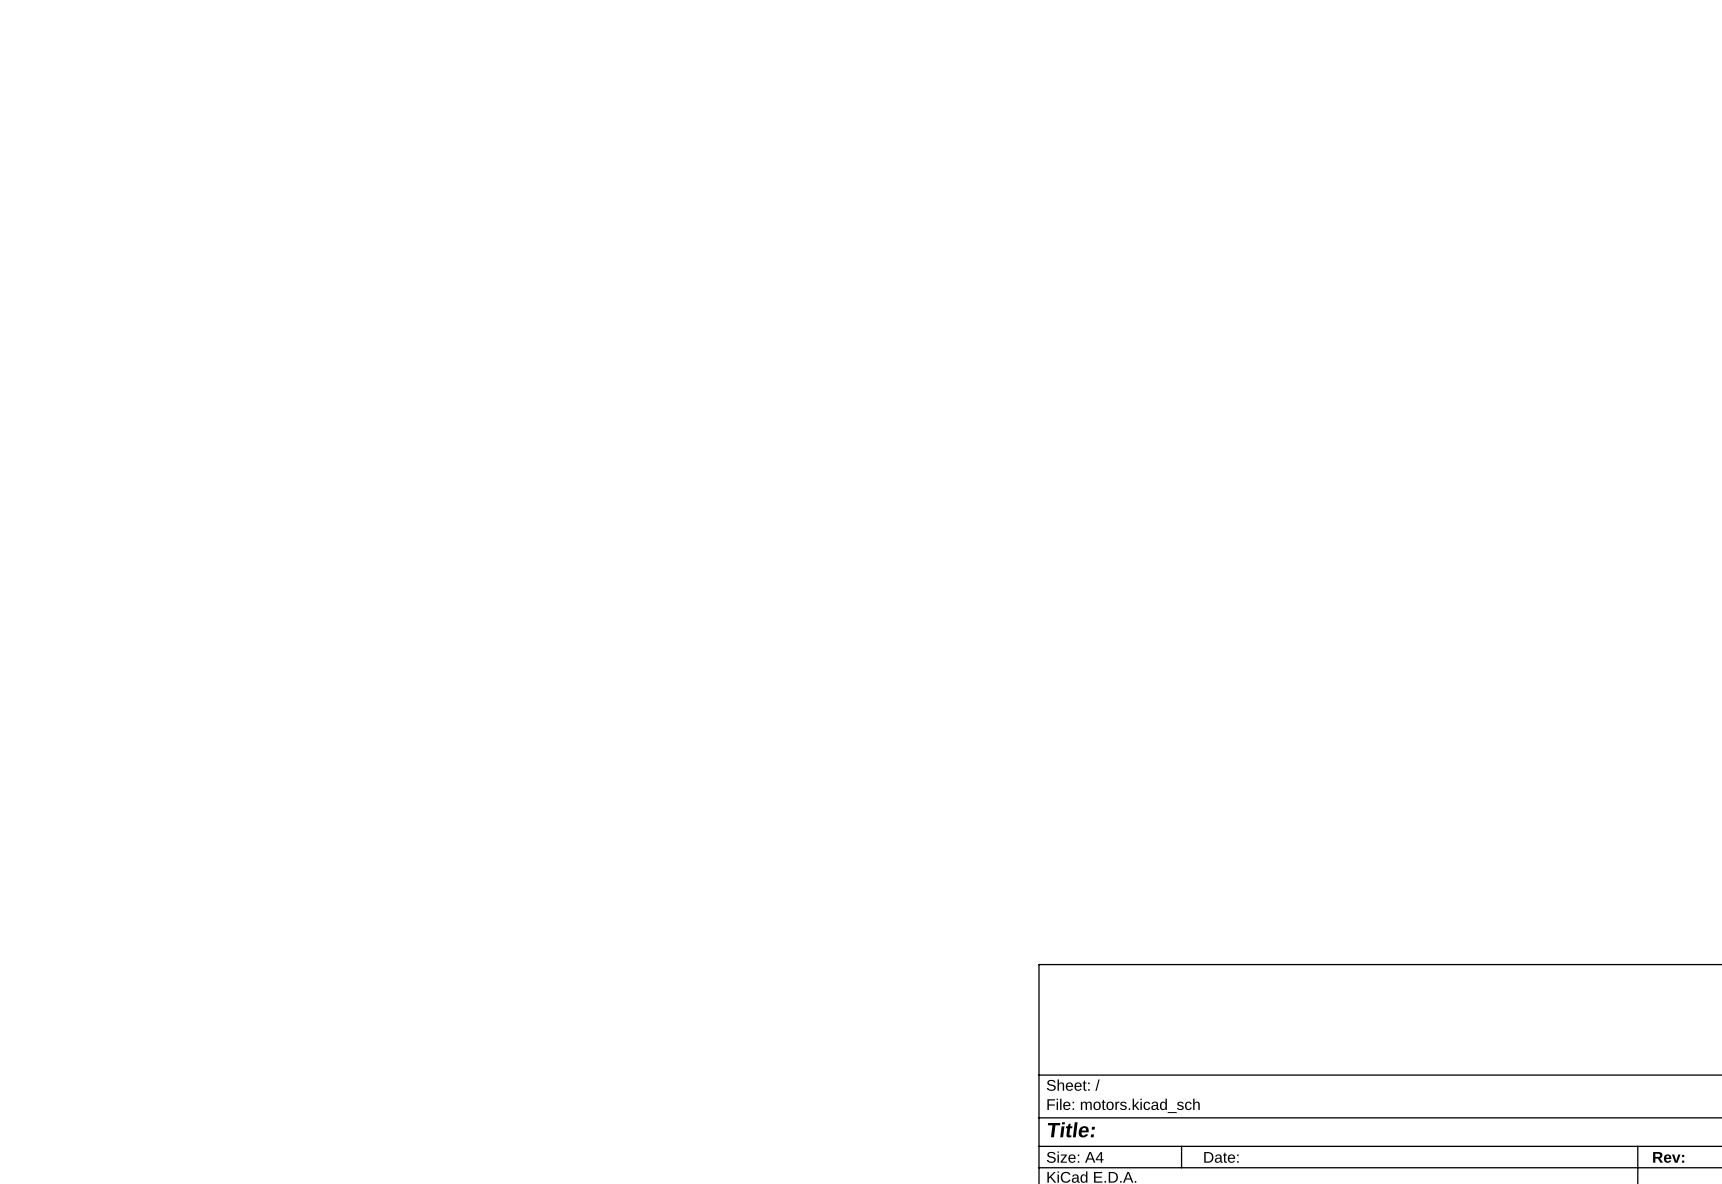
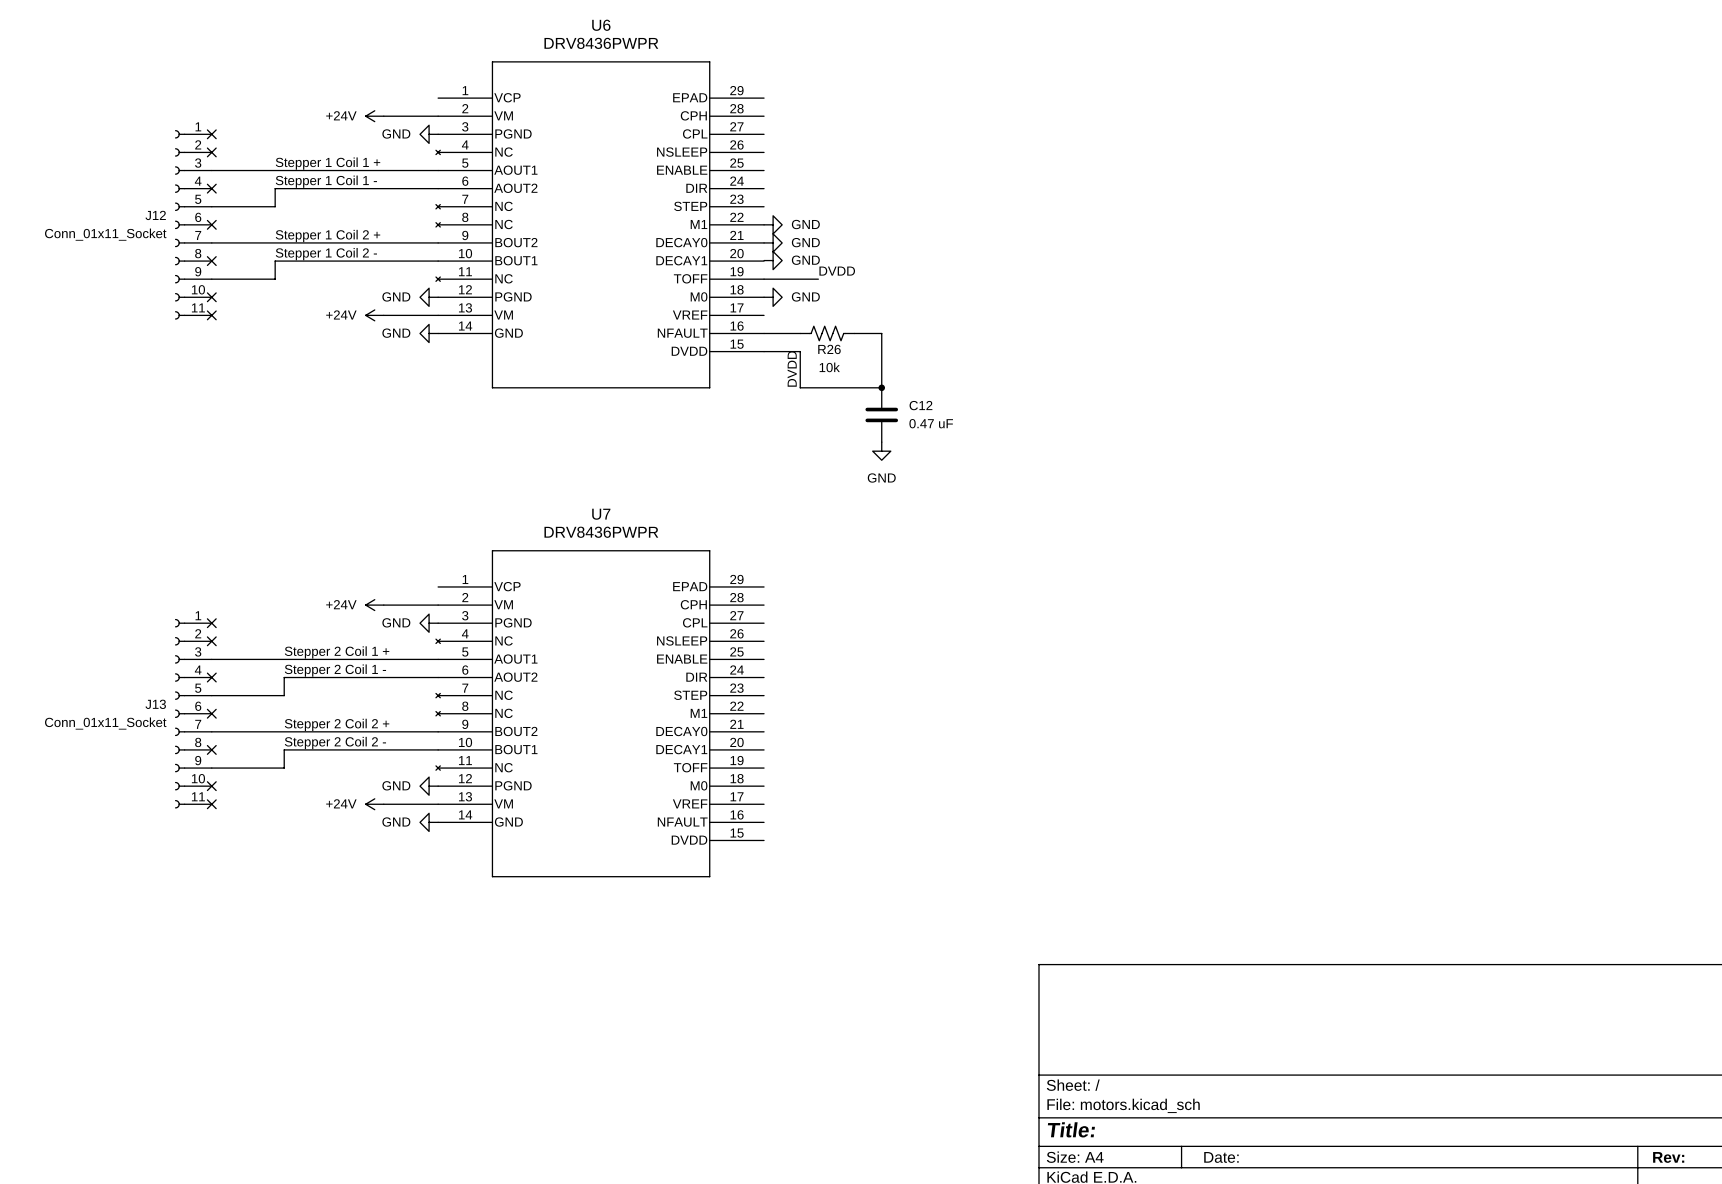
power symbol: none -> +24V (374, 116)
wire: none -> (383, 116) (438, 116)
no-connect mark: none -> (211, 134)
power symbol: none -> GND (429, 134)
no-connect mark: none -> (211, 152)
label: none -> Stepper 1 Coil 1 + (327, 163)
wire: none -> (211, 170) (438, 170)
label: none -> Stepper 1 Coil 1 - (326, 181)
no-connect mark: none -> (211, 188)
wire: none -> (438, 188) (275, 188) (275, 206) (211, 206)
J12: none -> Conn_01x11_Socket (193, 224)
no-connect mark: none -> (211, 224)
U6: none -> DRV8436PWPR (600, 224)
power symbol: none -> GND (773, 224)
label: none -> Stepper 1 Coil 2 + (327, 236)
wire: none -> (211, 242) (438, 242)
power symbol: none -> GND (773, 242)
label: none -> Stepper 1 Coil 2 - (326, 254)
power symbol: none -> GND (773, 260)
no-connect mark: none -> (211, 261)
wire: none -> (438, 261) (275, 261) (275, 279) (211, 279)
label: none -> DVDD (837, 271)
wire: none -> (764, 279) (818, 279)
no-connect mark: none -> (211, 297)
power symbol: none -> GND (429, 297)
power symbol: none -> GND (773, 297)
no-connect mark: none -> (211, 315)
power symbol: none -> +24V (374, 315)
wire: none -> (383, 315) (438, 315)
power symbol: none -> GND (429, 333)
wire: none -> (764, 333) (800, 333)
R26: none -> 10k (827, 333)
wire: none -> (854, 333) (881, 333) (881, 387) (800, 387) (800, 351) (764, 351)
label: none -> DVDD (792, 368)
junction: none -> (881, 387)
C12: none -> 0.47 uF (881, 414)
power symbol: none -> GND (881, 451)
power symbol: none -> +24V (374, 605)
wire: none -> (383, 605) (438, 605)
no-connect mark: none -> (211, 623)
power symbol: none -> GND (429, 623)
no-connect mark: none -> (211, 641)
label: none -> Stepper 2 Coil 1 + (337, 652)
wire: none -> (211, 659) (438, 659)
label: none -> Stepper 2 Coil 1 - (335, 670)
no-connect mark: none -> (211, 677)
wire: none -> (438, 677) (284, 677) (284, 695) (211, 695)
J13: none -> Conn_01x11_Socket (193, 713)
no-connect mark: none -> (211, 713)
U7: none -> DRV8436PWPR (600, 713)
label: none -> Stepper 2 Coil 2 + (337, 724)
wire: none -> (211, 731) (438, 731)
label: none -> Stepper 2 Coil 2 - (335, 742)
no-connect mark: none -> (211, 749)
wire: none -> (438, 749) (284, 749) (284, 768) (211, 768)
no-connect mark: none -> (211, 786)
power symbol: none -> GND (429, 786)
no-connect mark: none -> (211, 804)
power symbol: none -> +24V (374, 804)
wire: none -> (383, 804) (438, 804)
power symbol: none -> GND (429, 822)

